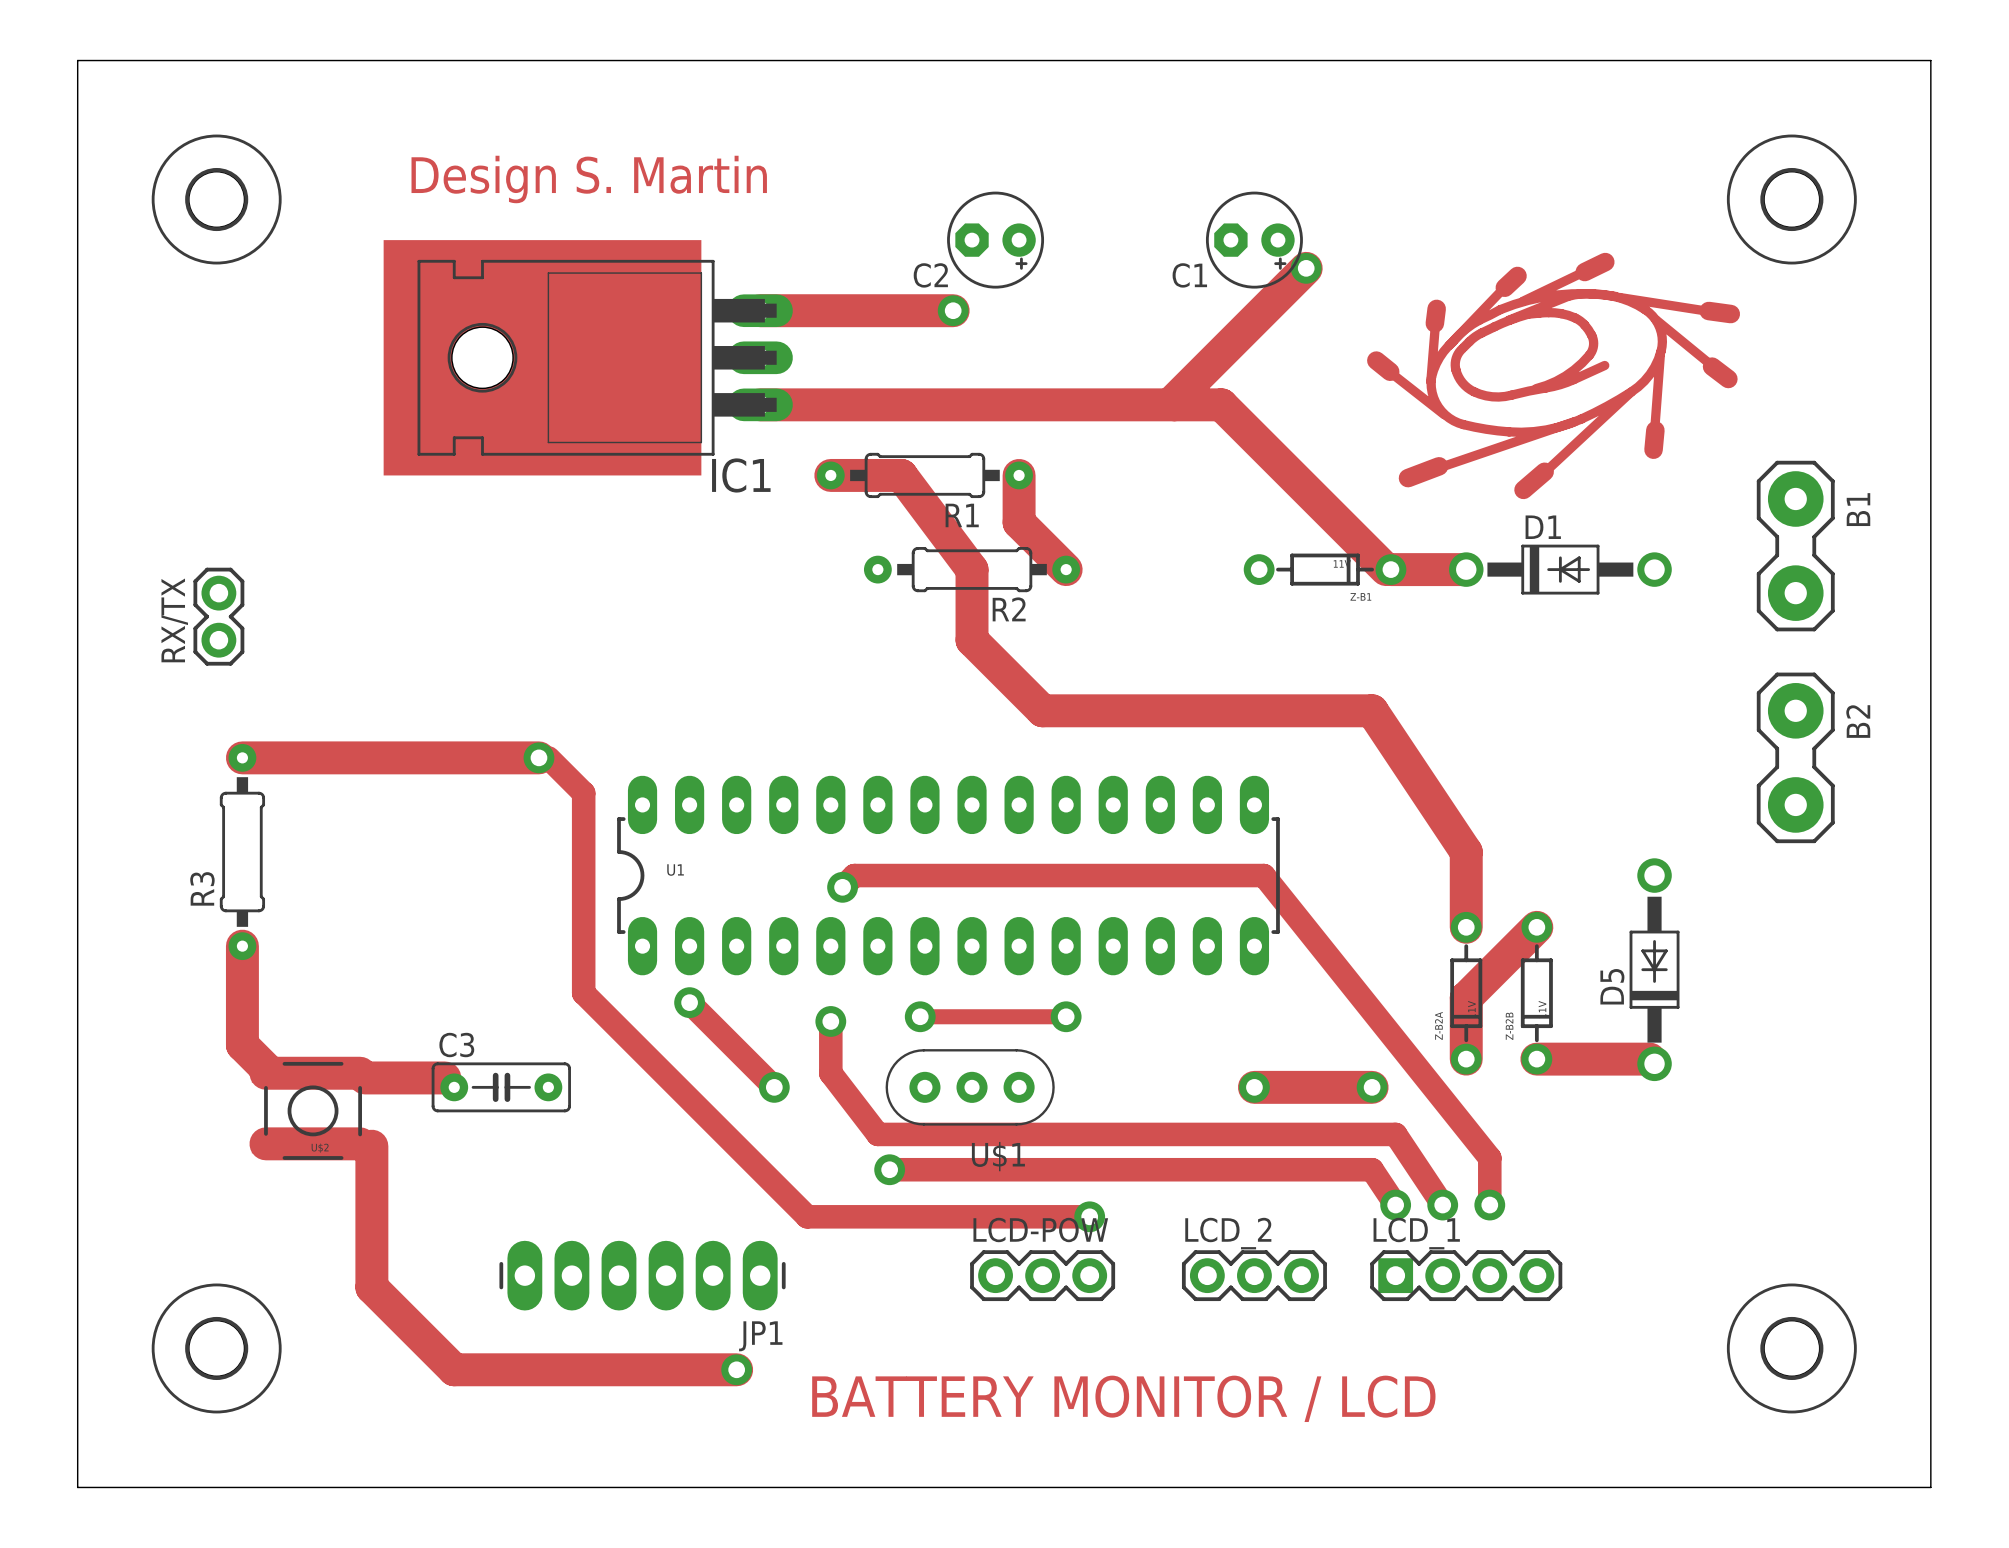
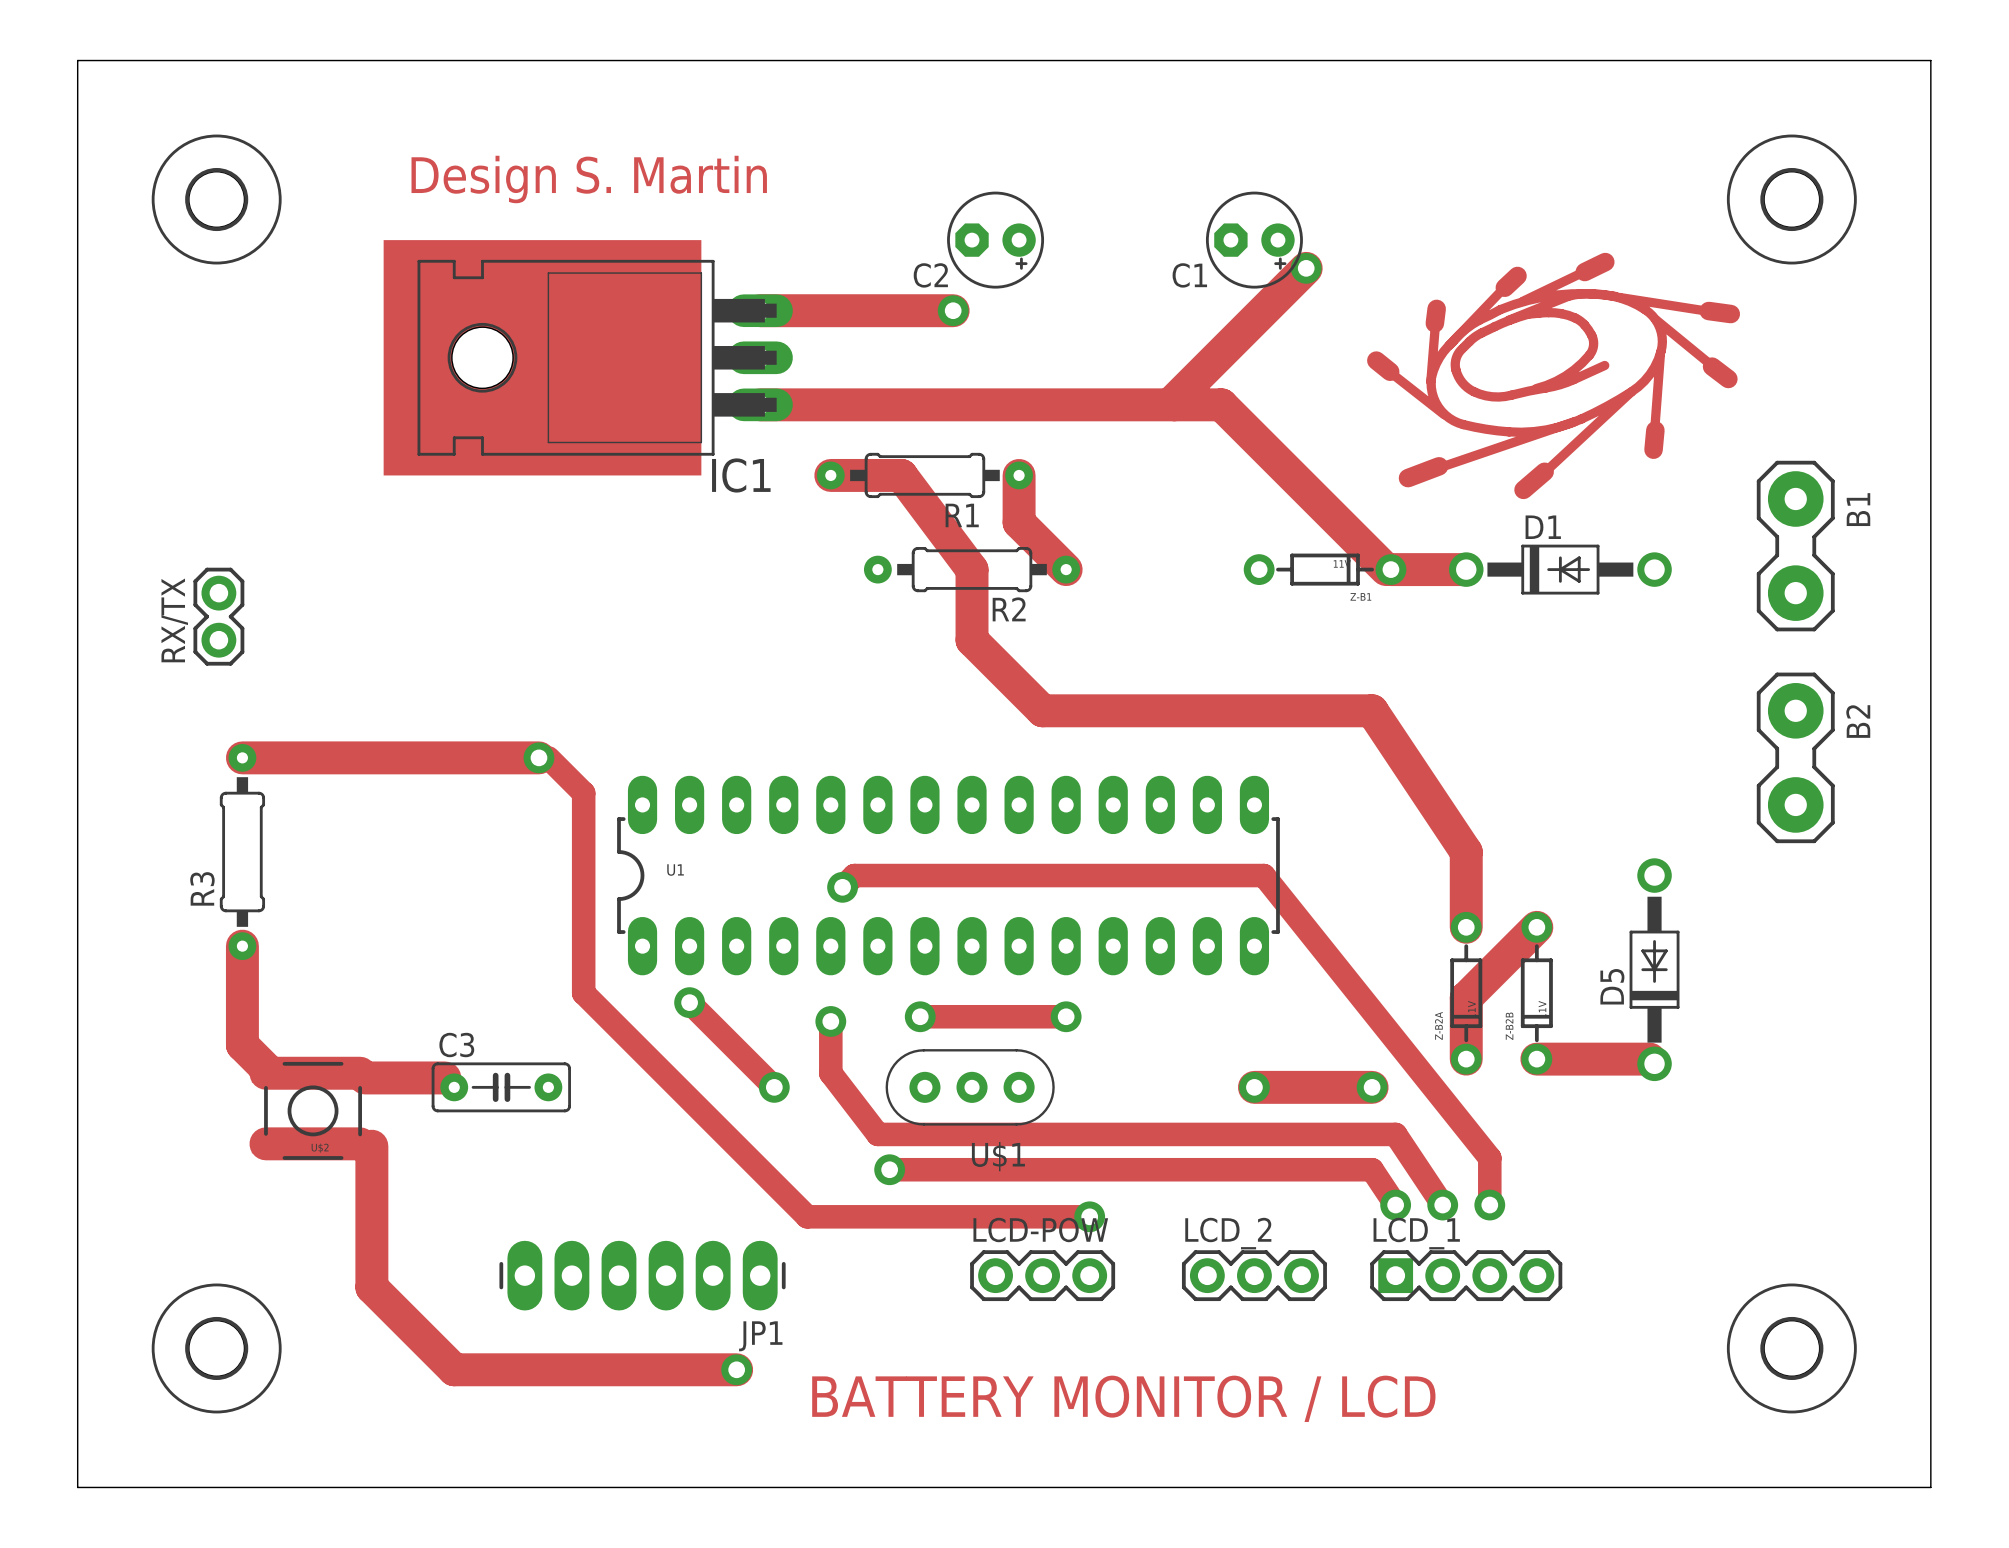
track width: thin (920, 1016) (1066, 1016) -> thick (920, 1016) (1066, 1016)

